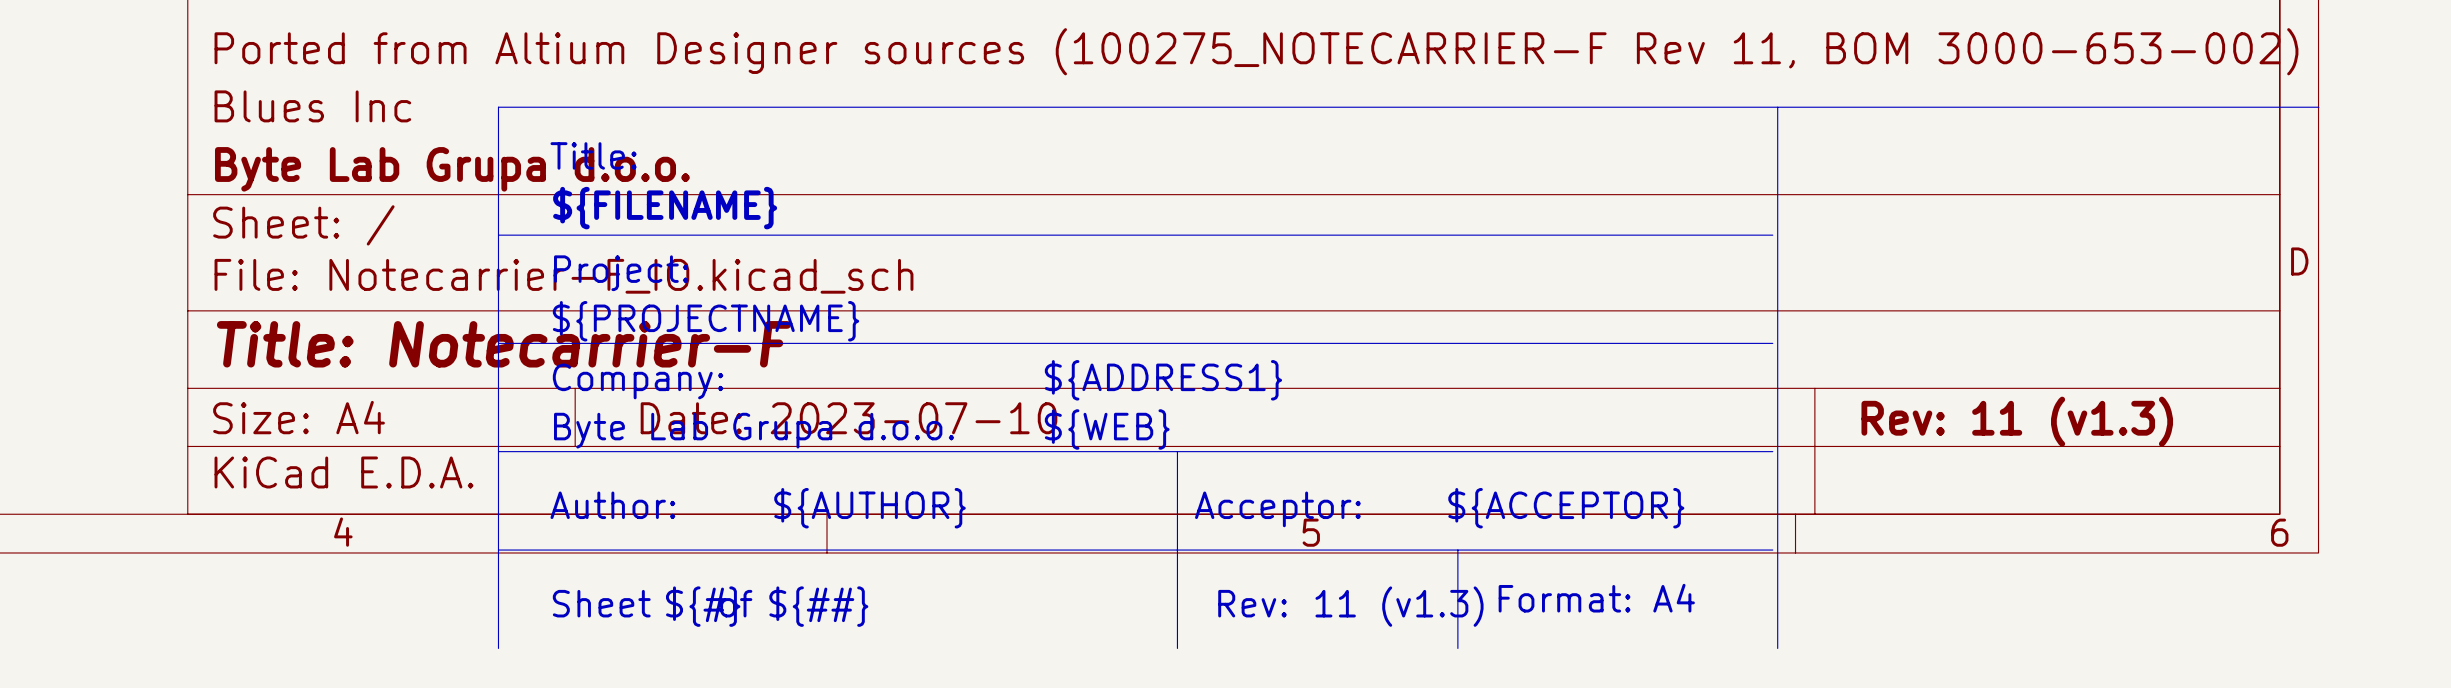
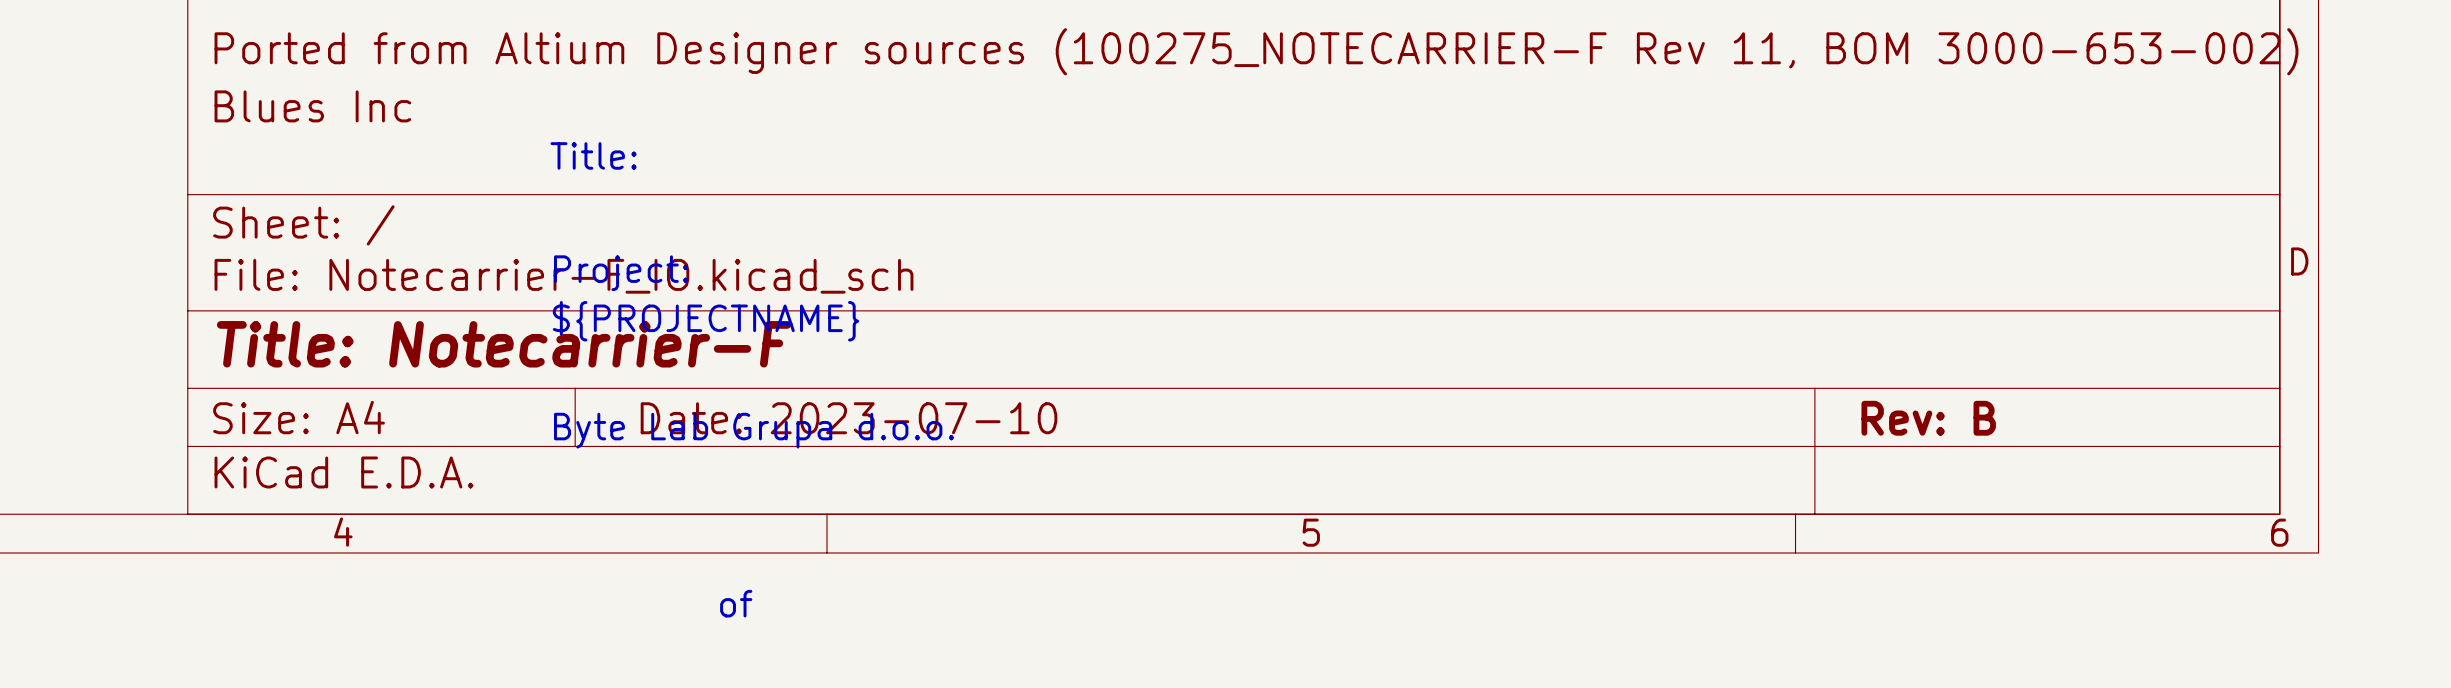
line: (1777, 107) (1777, 648) -> none
line: (2318, 107) (498, 107) (498, 648) -> none
title block: Byte Lab Grupa d.o.o. (452, 169) -> none
text: ${FILENAME} (665, 208) -> none
line: (498, 235) (1772, 235) -> none
line: (498, 343) (1772, 343) -> none
text: ${ADDRESS1} (1163, 380) -> none
text: Company: (638, 381) -> none
title block: Rev: 11 (v1.3) (2017, 421) -> Rev: B (1928, 418)
text: ${WEB} (1107, 429) -> none
line: (498, 451) (1772, 451) -> none
line: (1177, 451) (1177, 648) -> none
text: Author: (612, 505) -> none
text: ${AUTHOR} (870, 508) -> none
text: ${ACCEPTOR} (1566, 508) -> none
text: Acceptor: (1277, 509) -> none
line: (498, 550) (1772, 550) -> none
line: (1457, 550) (1457, 648) -> none
text: Format: A4 (1596, 598) -> none
text: Sheet (601, 603) -> none
text: Rev: (1252, 603) -> none
text: ${#} (703, 606) -> none
text: ${##} (818, 606) -> none
text: 11 (v1.3) (1399, 606) -> none

